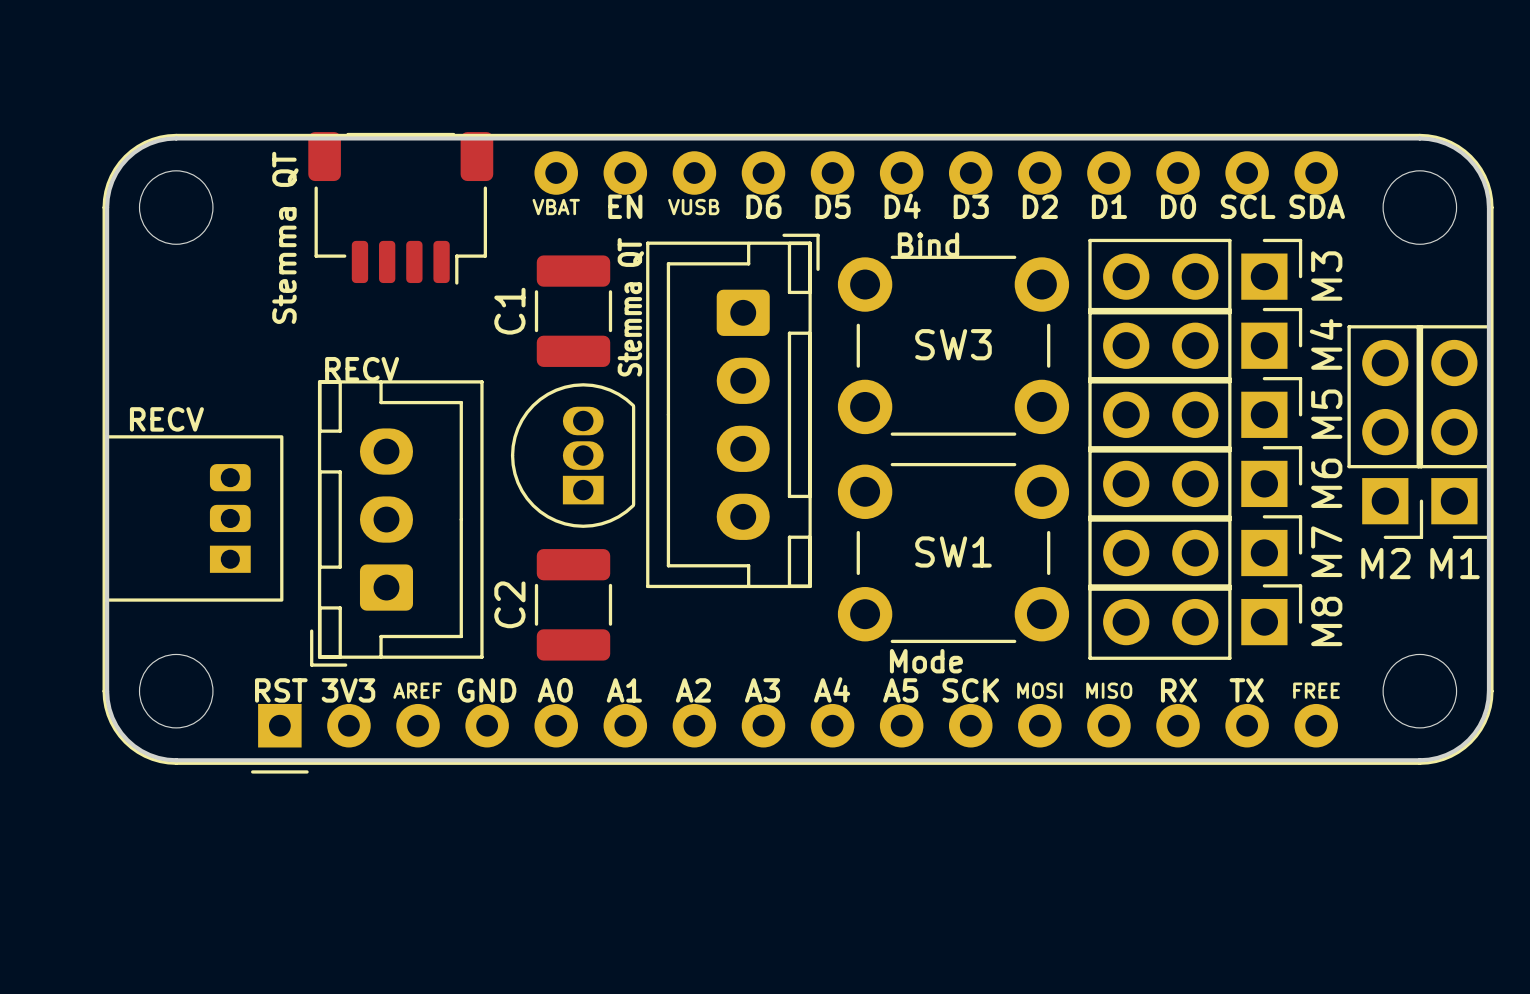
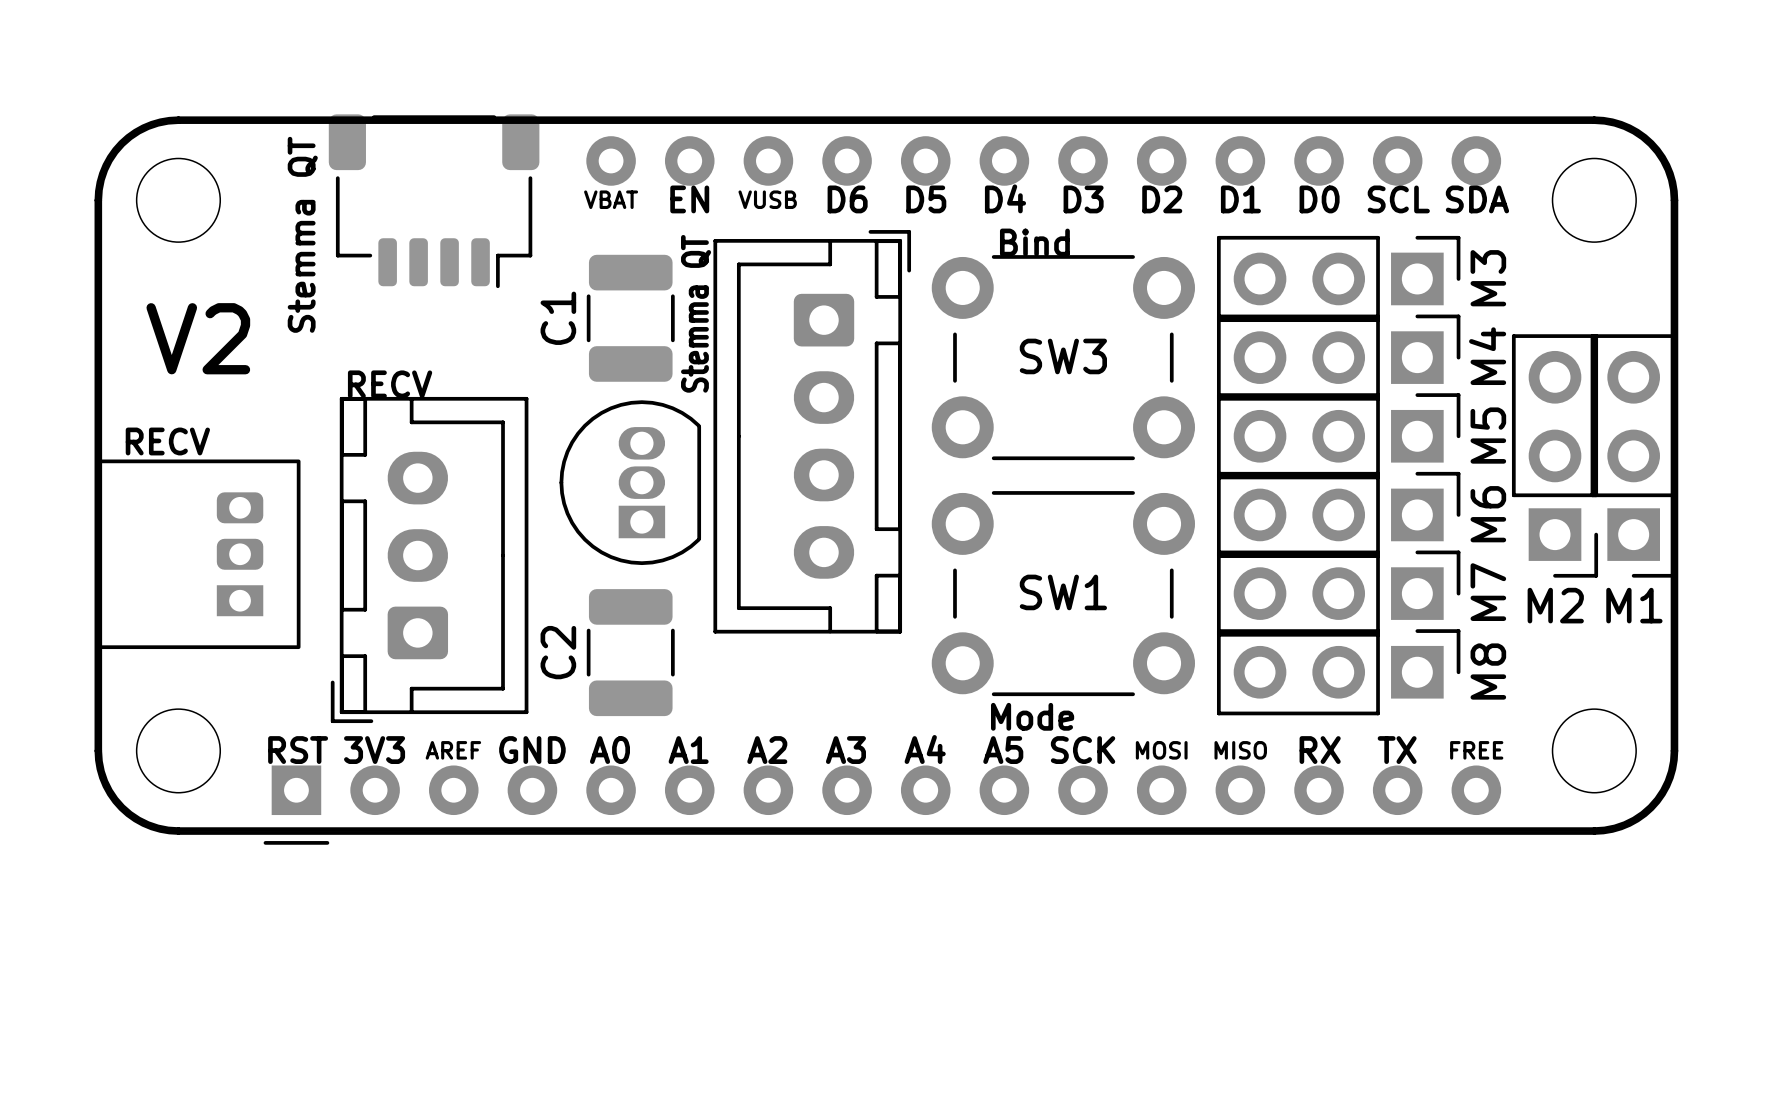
text: none -> V2 (198, 338)

